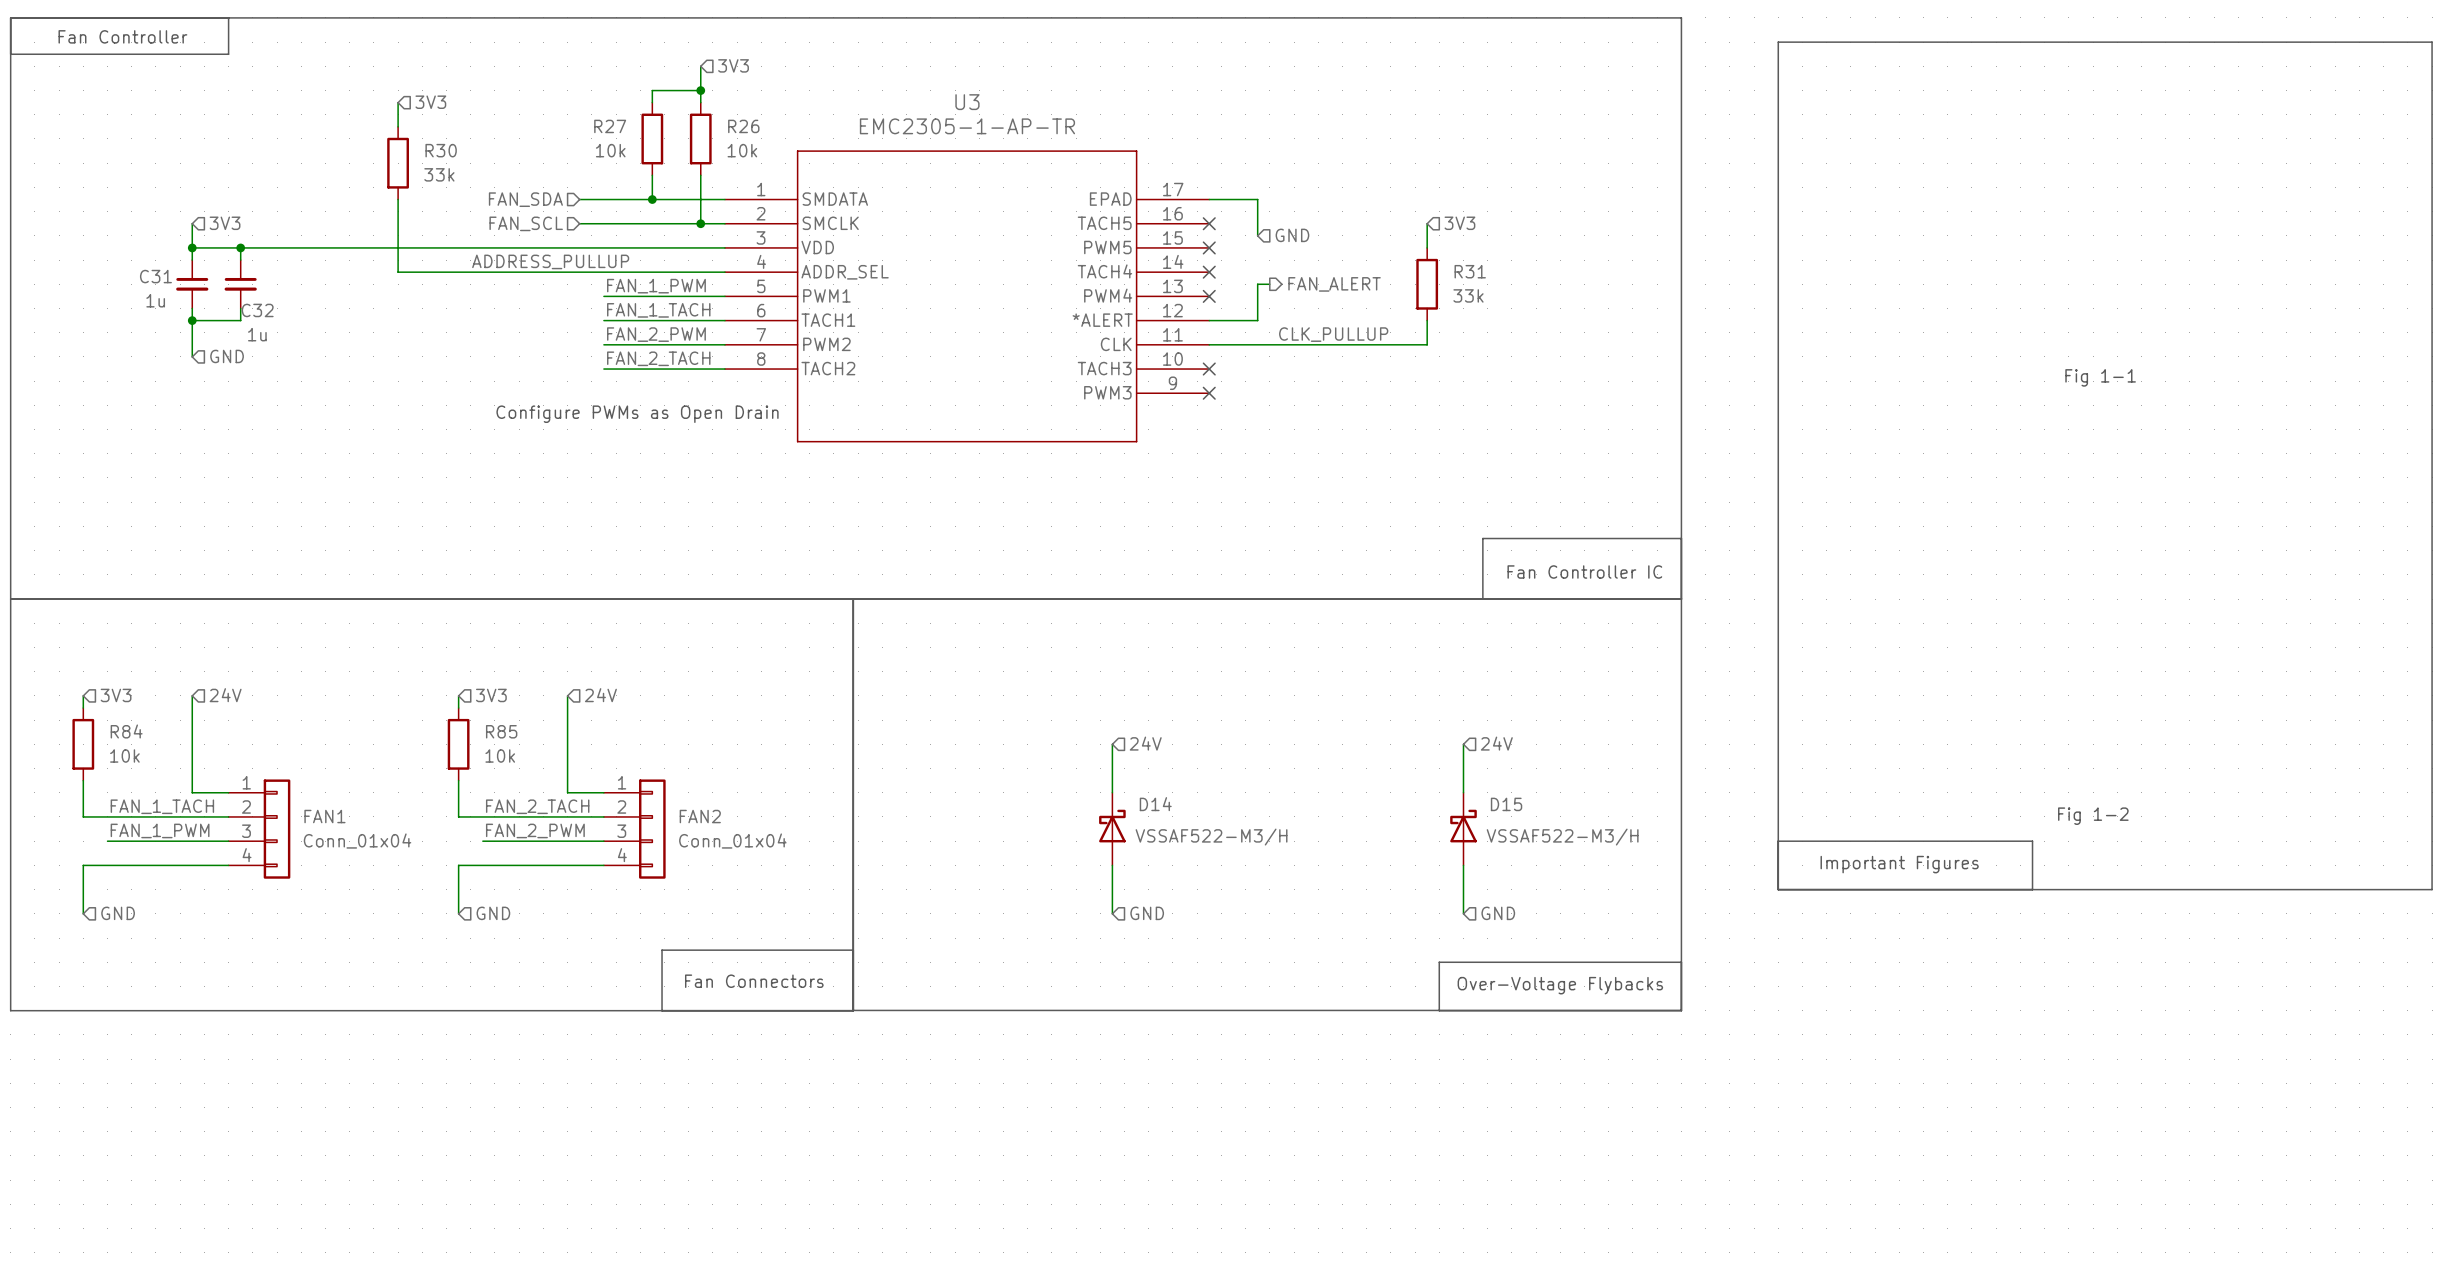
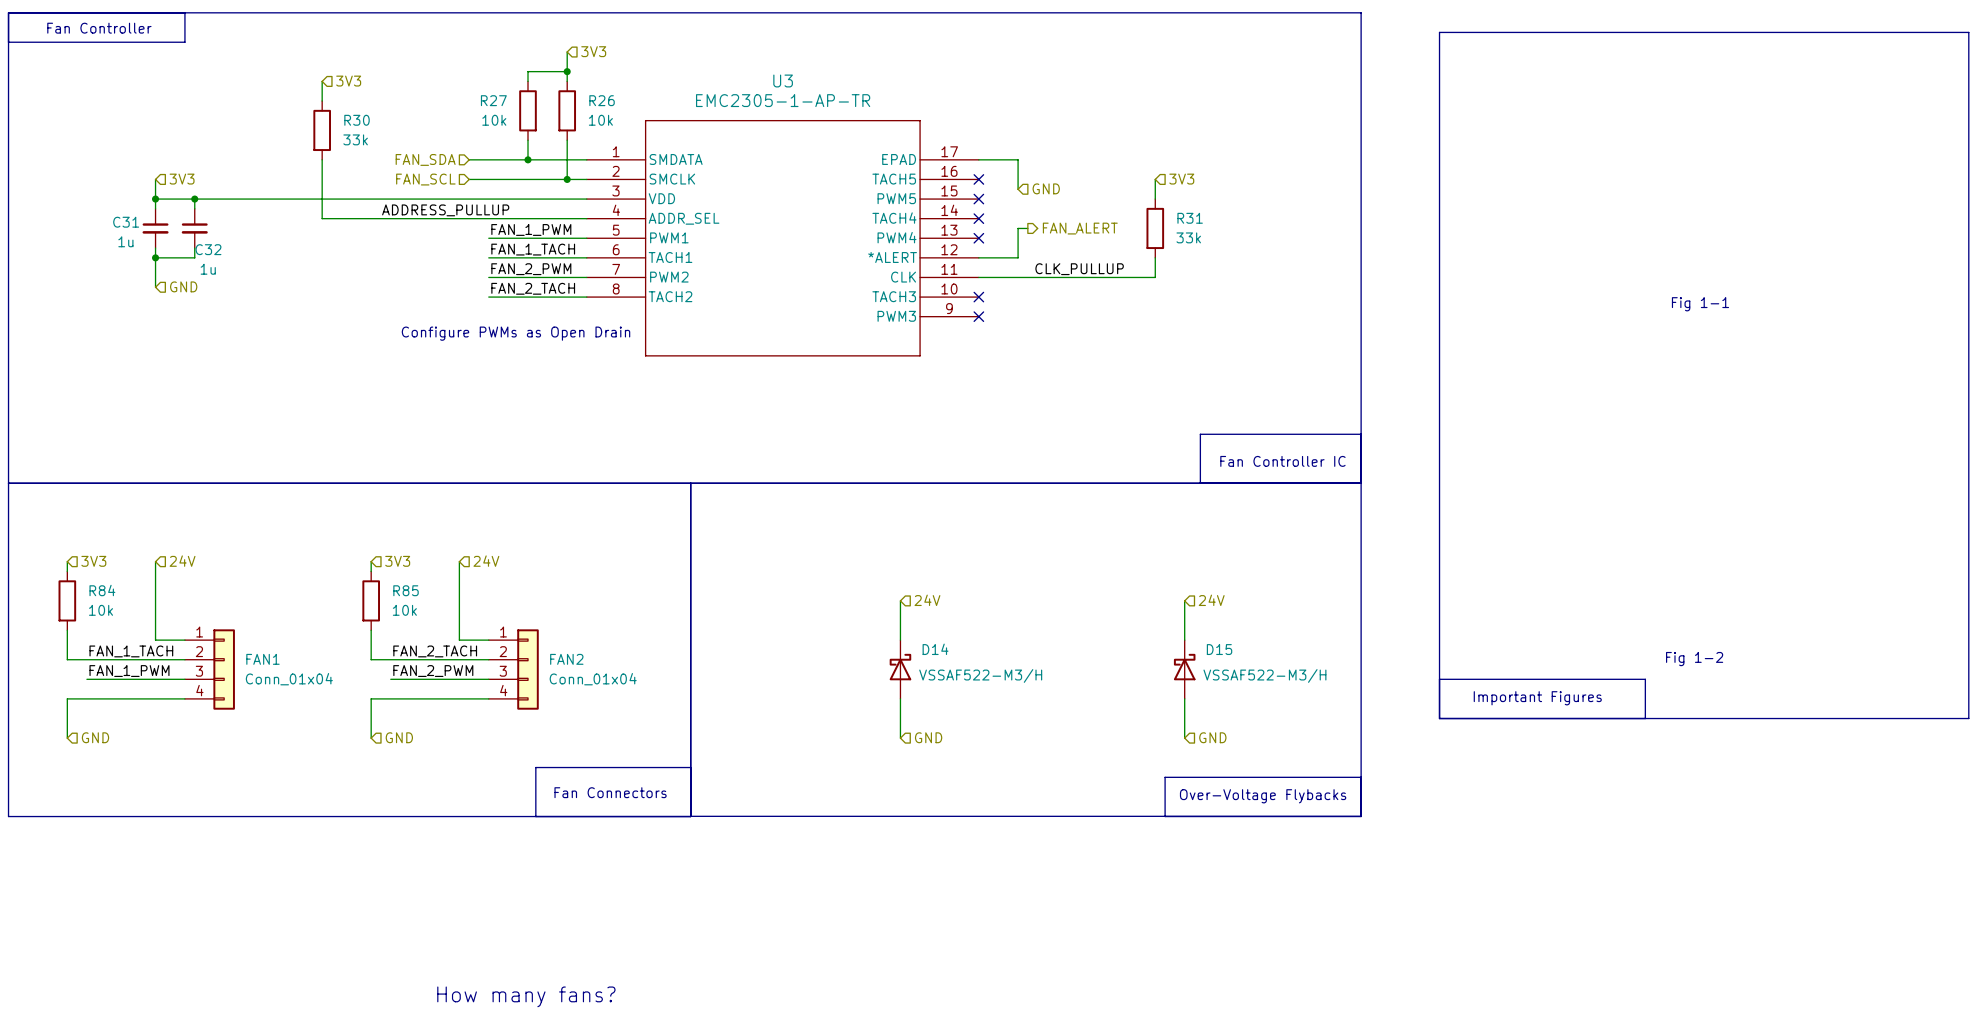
text: none -> How many fans? (526, 996)

